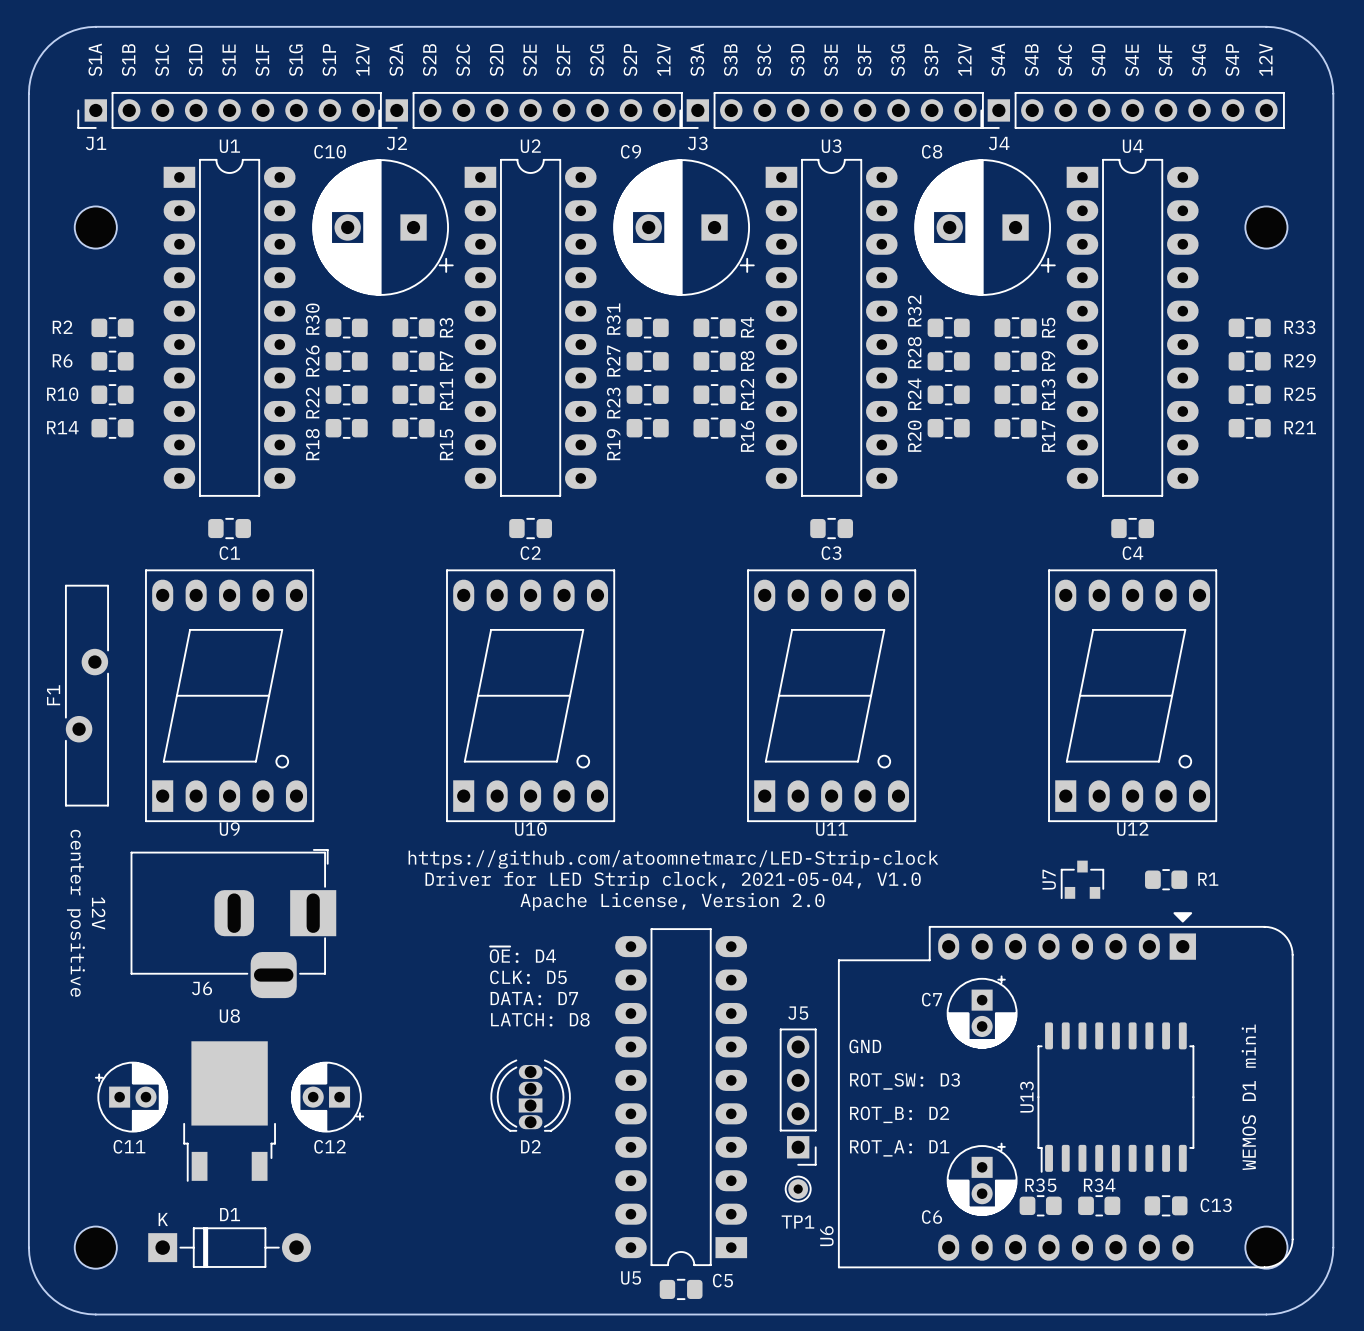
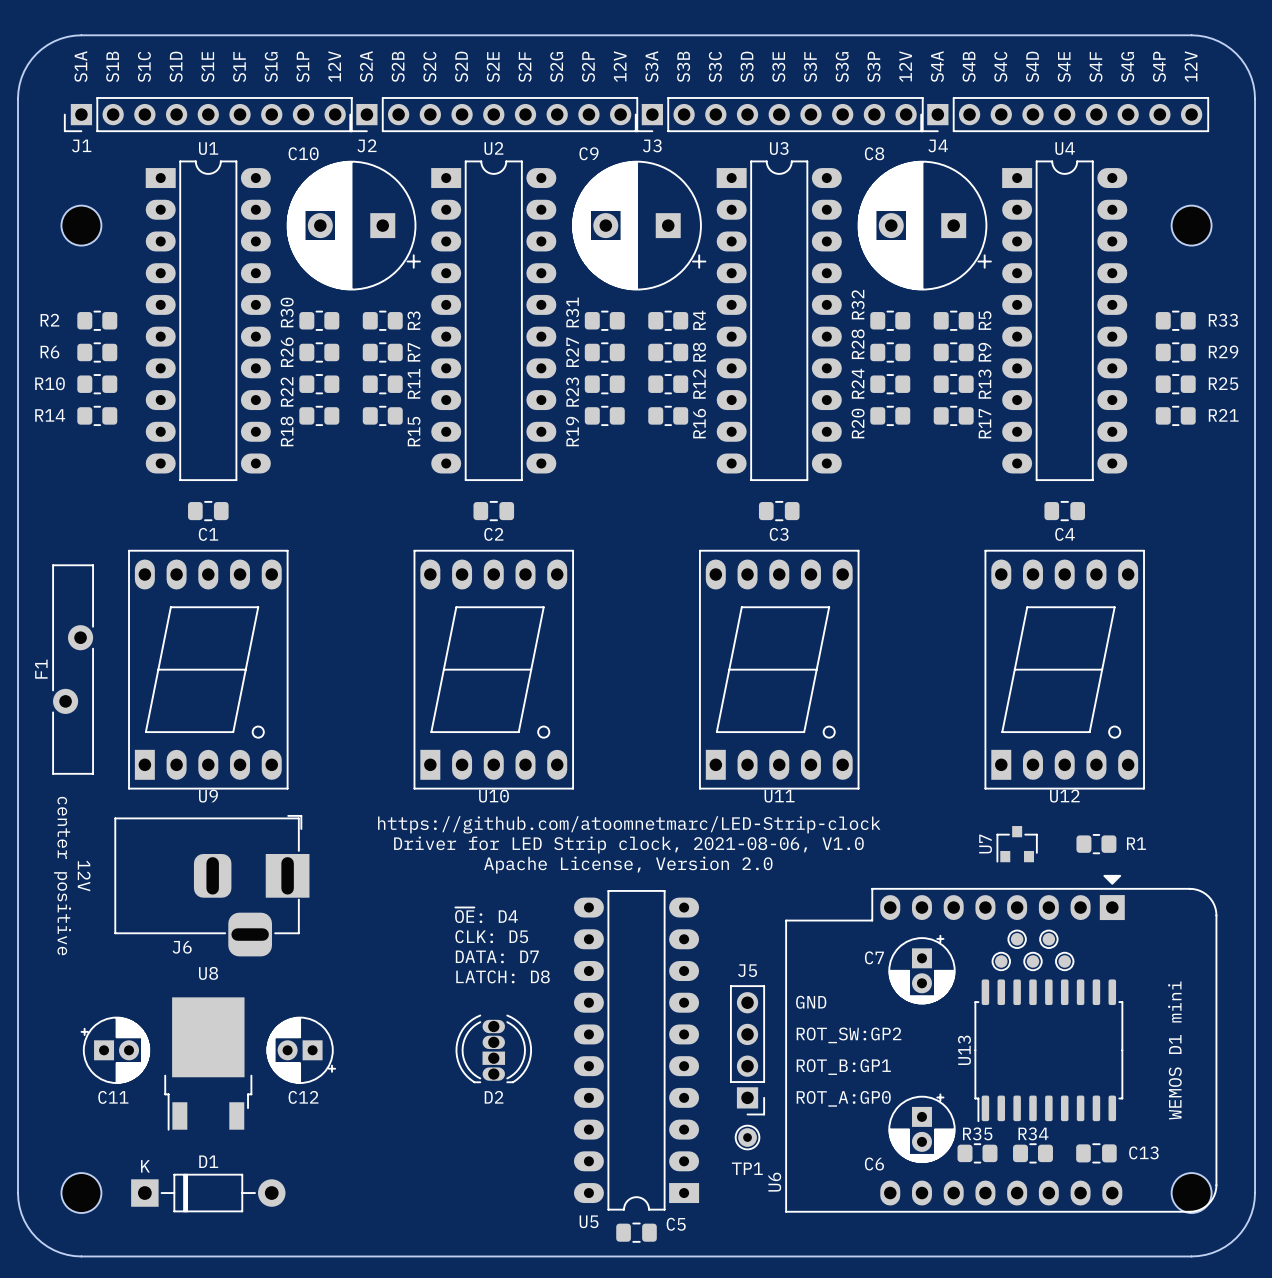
text: Driver for LED Strip clock, 2021-05-04, V1.0 (673, 880) -> Driver for LED Strip clock, 2021-08-06, V1.0 (628, 845)
part: none -> (1017, 939)
part: none -> (1048, 939)
part: none -> (1001, 961)
part: none -> (1033, 961)
part: none -> (1064, 961)
text: ROT_SW: D3 (905, 1081) -> ROT_SW:GP2 (849, 1035)
text: ROT_B: D2 (899, 1114) -> ROT_B:GP1 (843, 1067)
text: ROT_A: D1 (899, 1148) -> ROT_A:GP0 (843, 1098)

